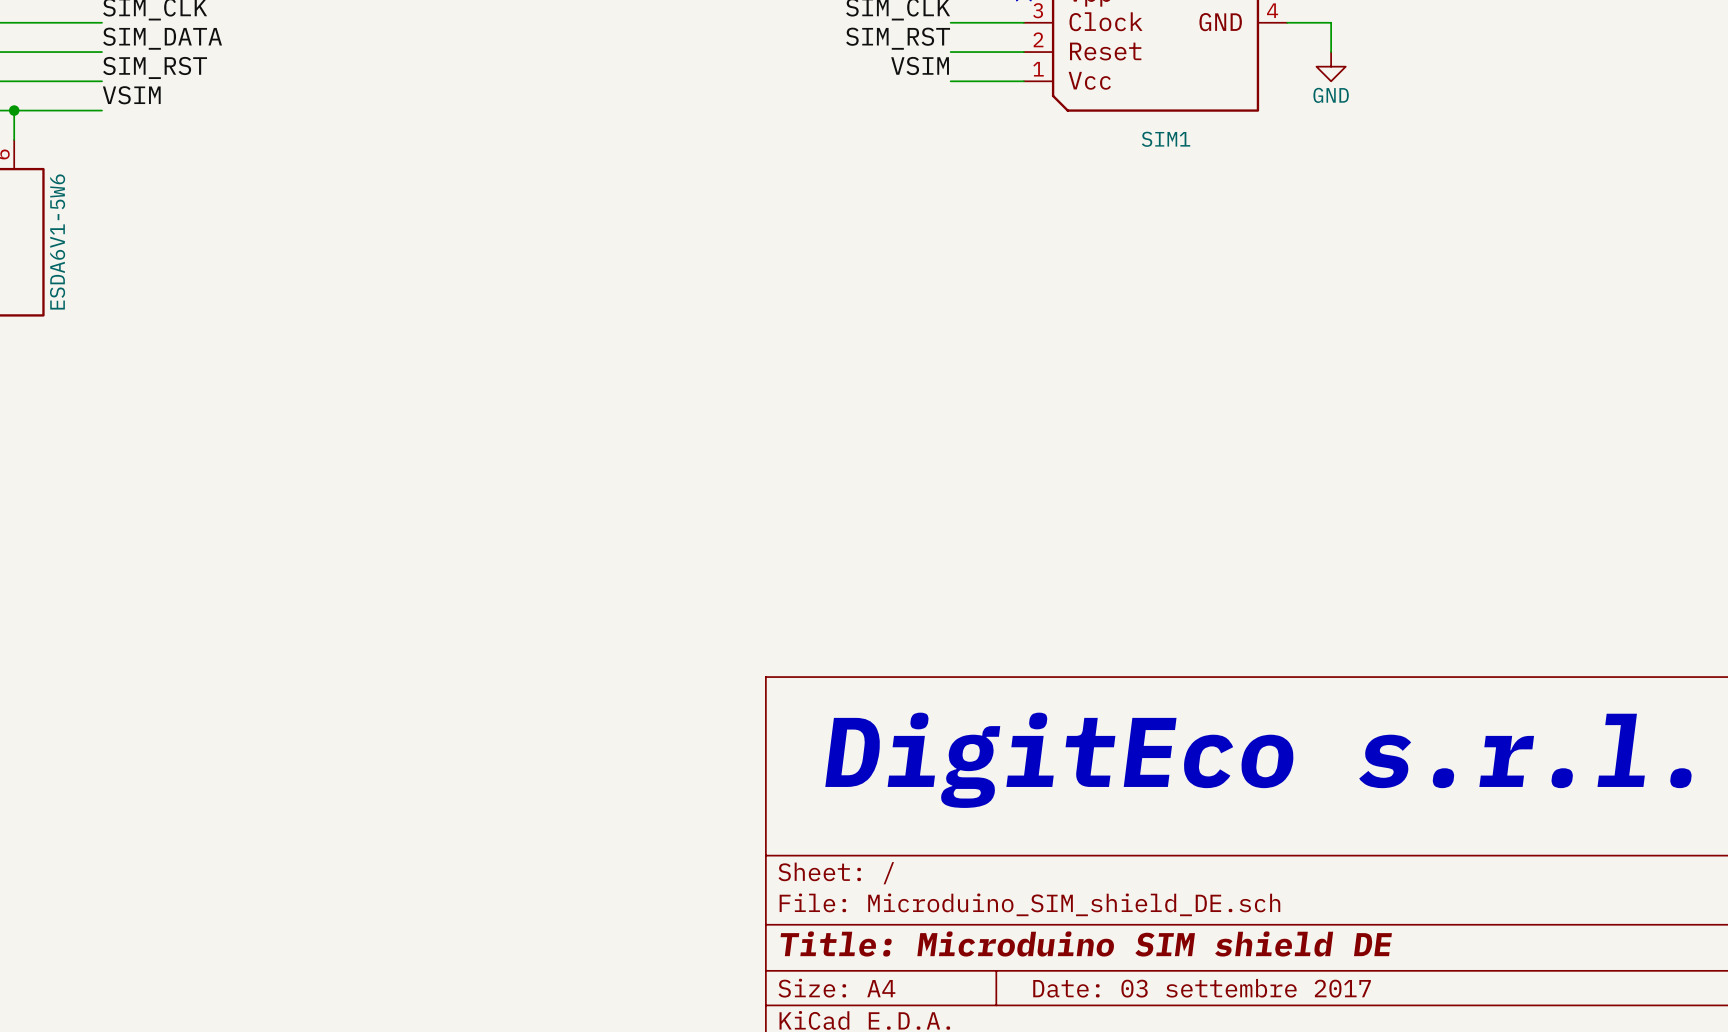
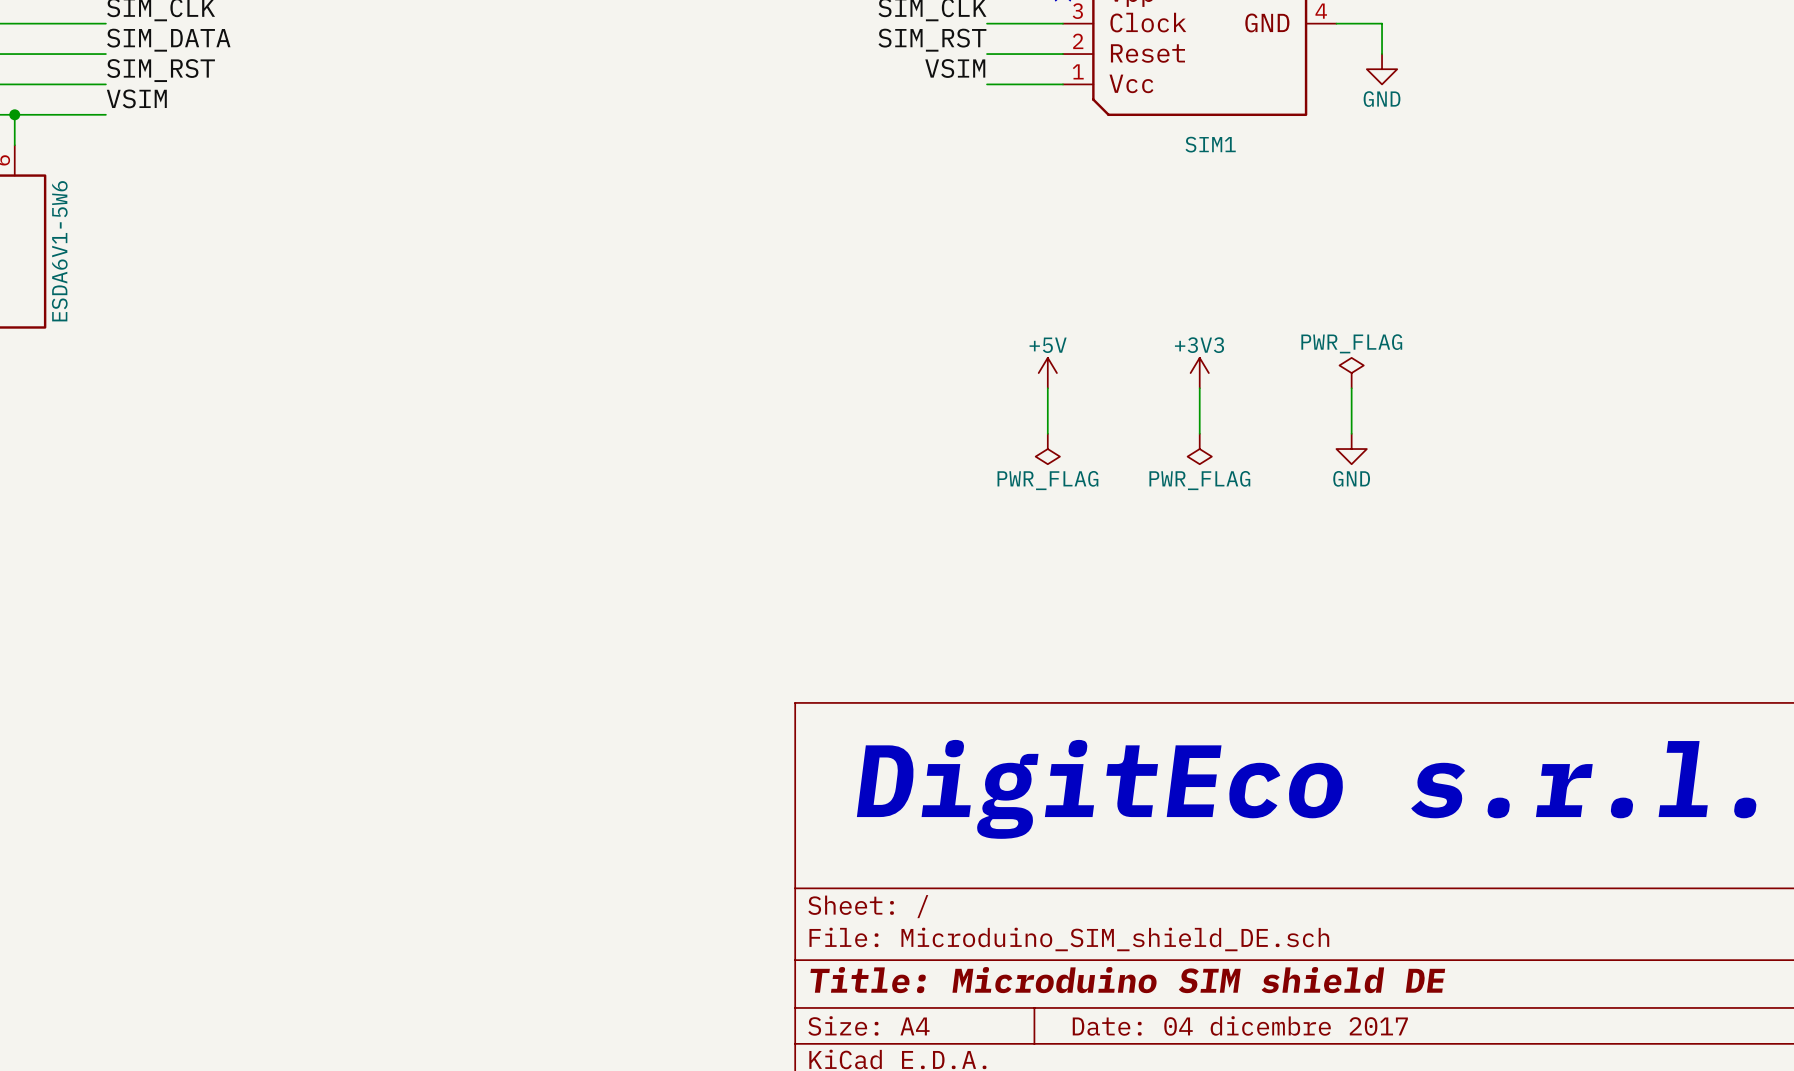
power symbol: none -> +5V (1047, 373)
power symbol: none -> +3V3 (1199, 373)
power symbol: none -> PWR_FLAG (1351, 373)
wire: none -> (1047, 388) (1047, 433)
wire: none -> (1199, 388) (1199, 433)
wire: none -> (1351, 388) (1351, 433)
power symbol: none -> PWR_FLAG (1047, 449)
power symbol: none -> PWR_FLAG (1199, 449)
power symbol: none -> GND (1351, 449)
title block: Date: 03 settembre 2017 (1202, 988) -> Date: 04 dicembre 2017 (1240, 1025)

